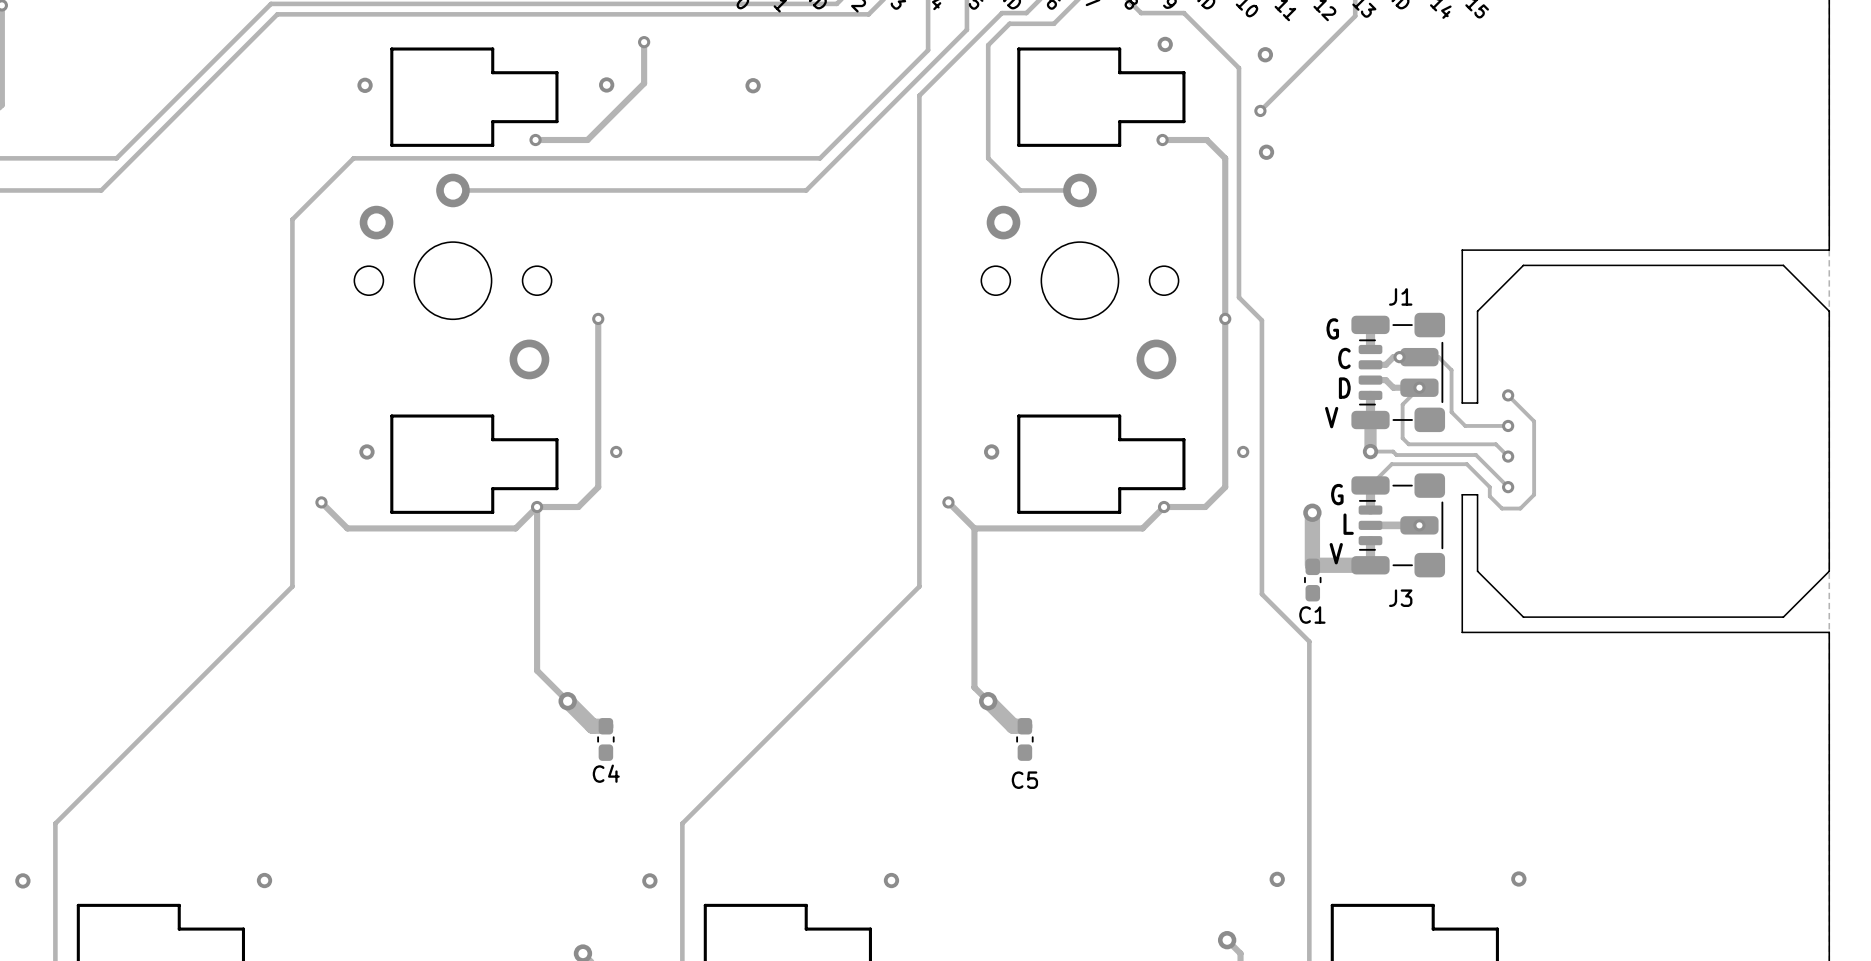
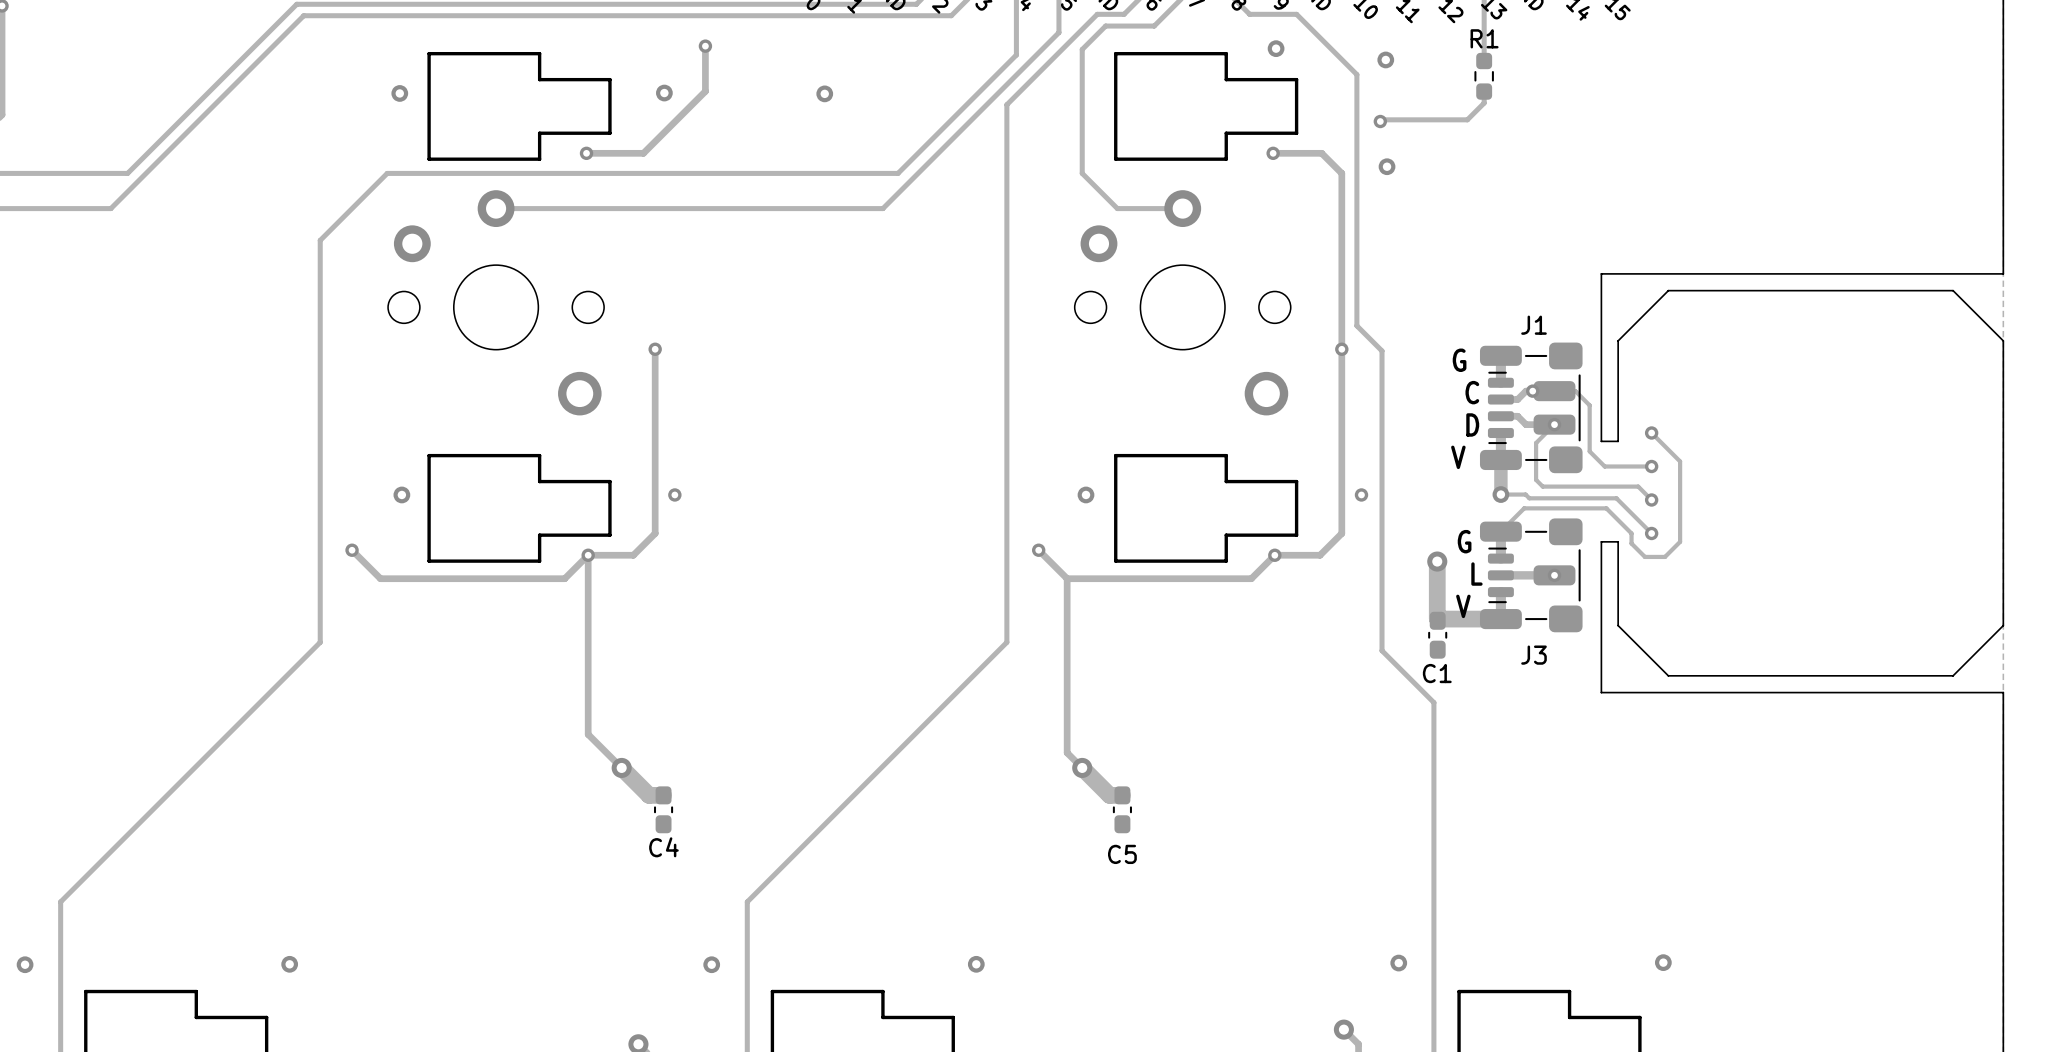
track: (1355, 16) (1260, 110) -> (1484, 17) (1484, 61)
R1: none -> (1484, 76)
track: none -> (1484, 91) (1484, 103) (1467, 119) (1378, 119)

